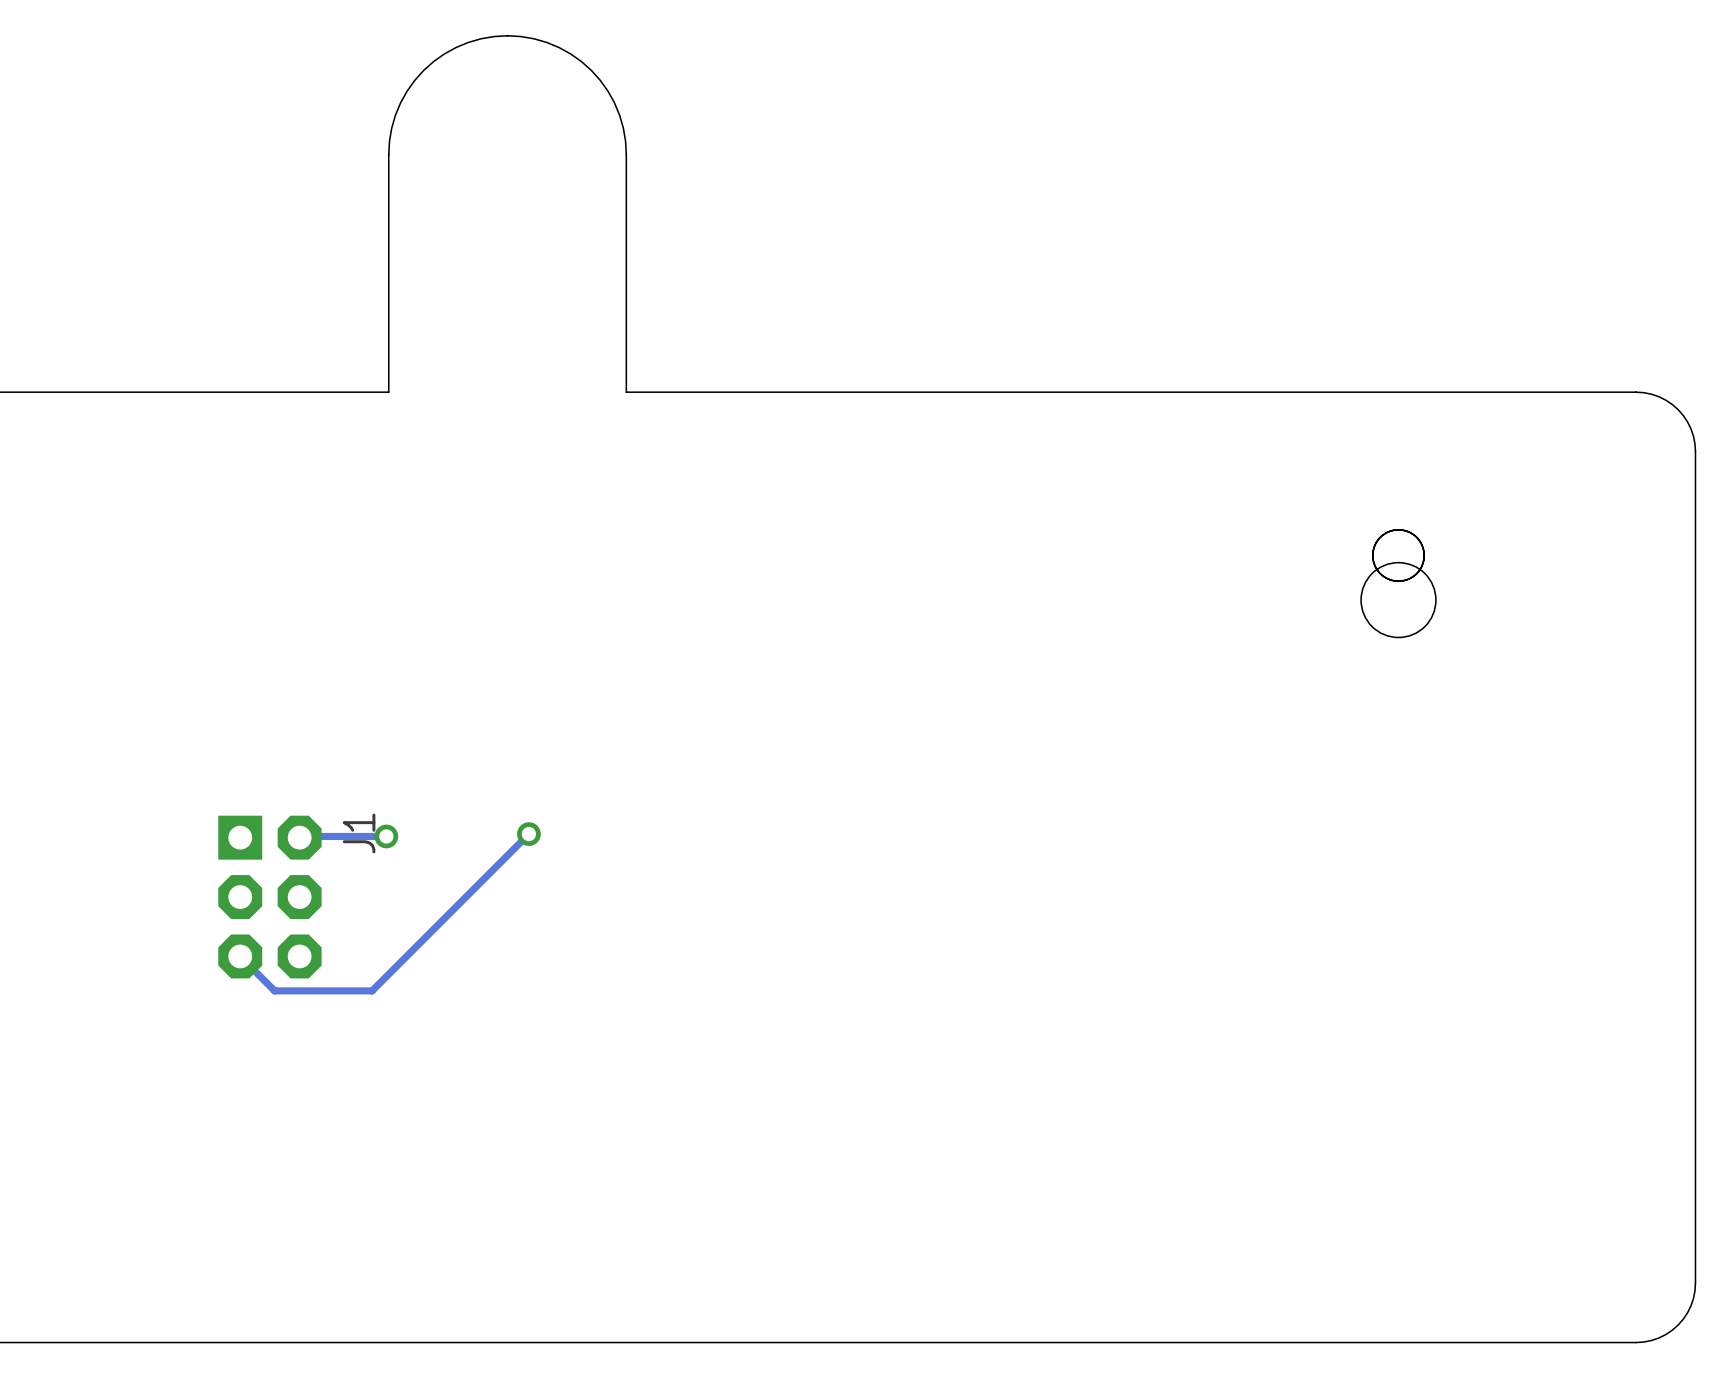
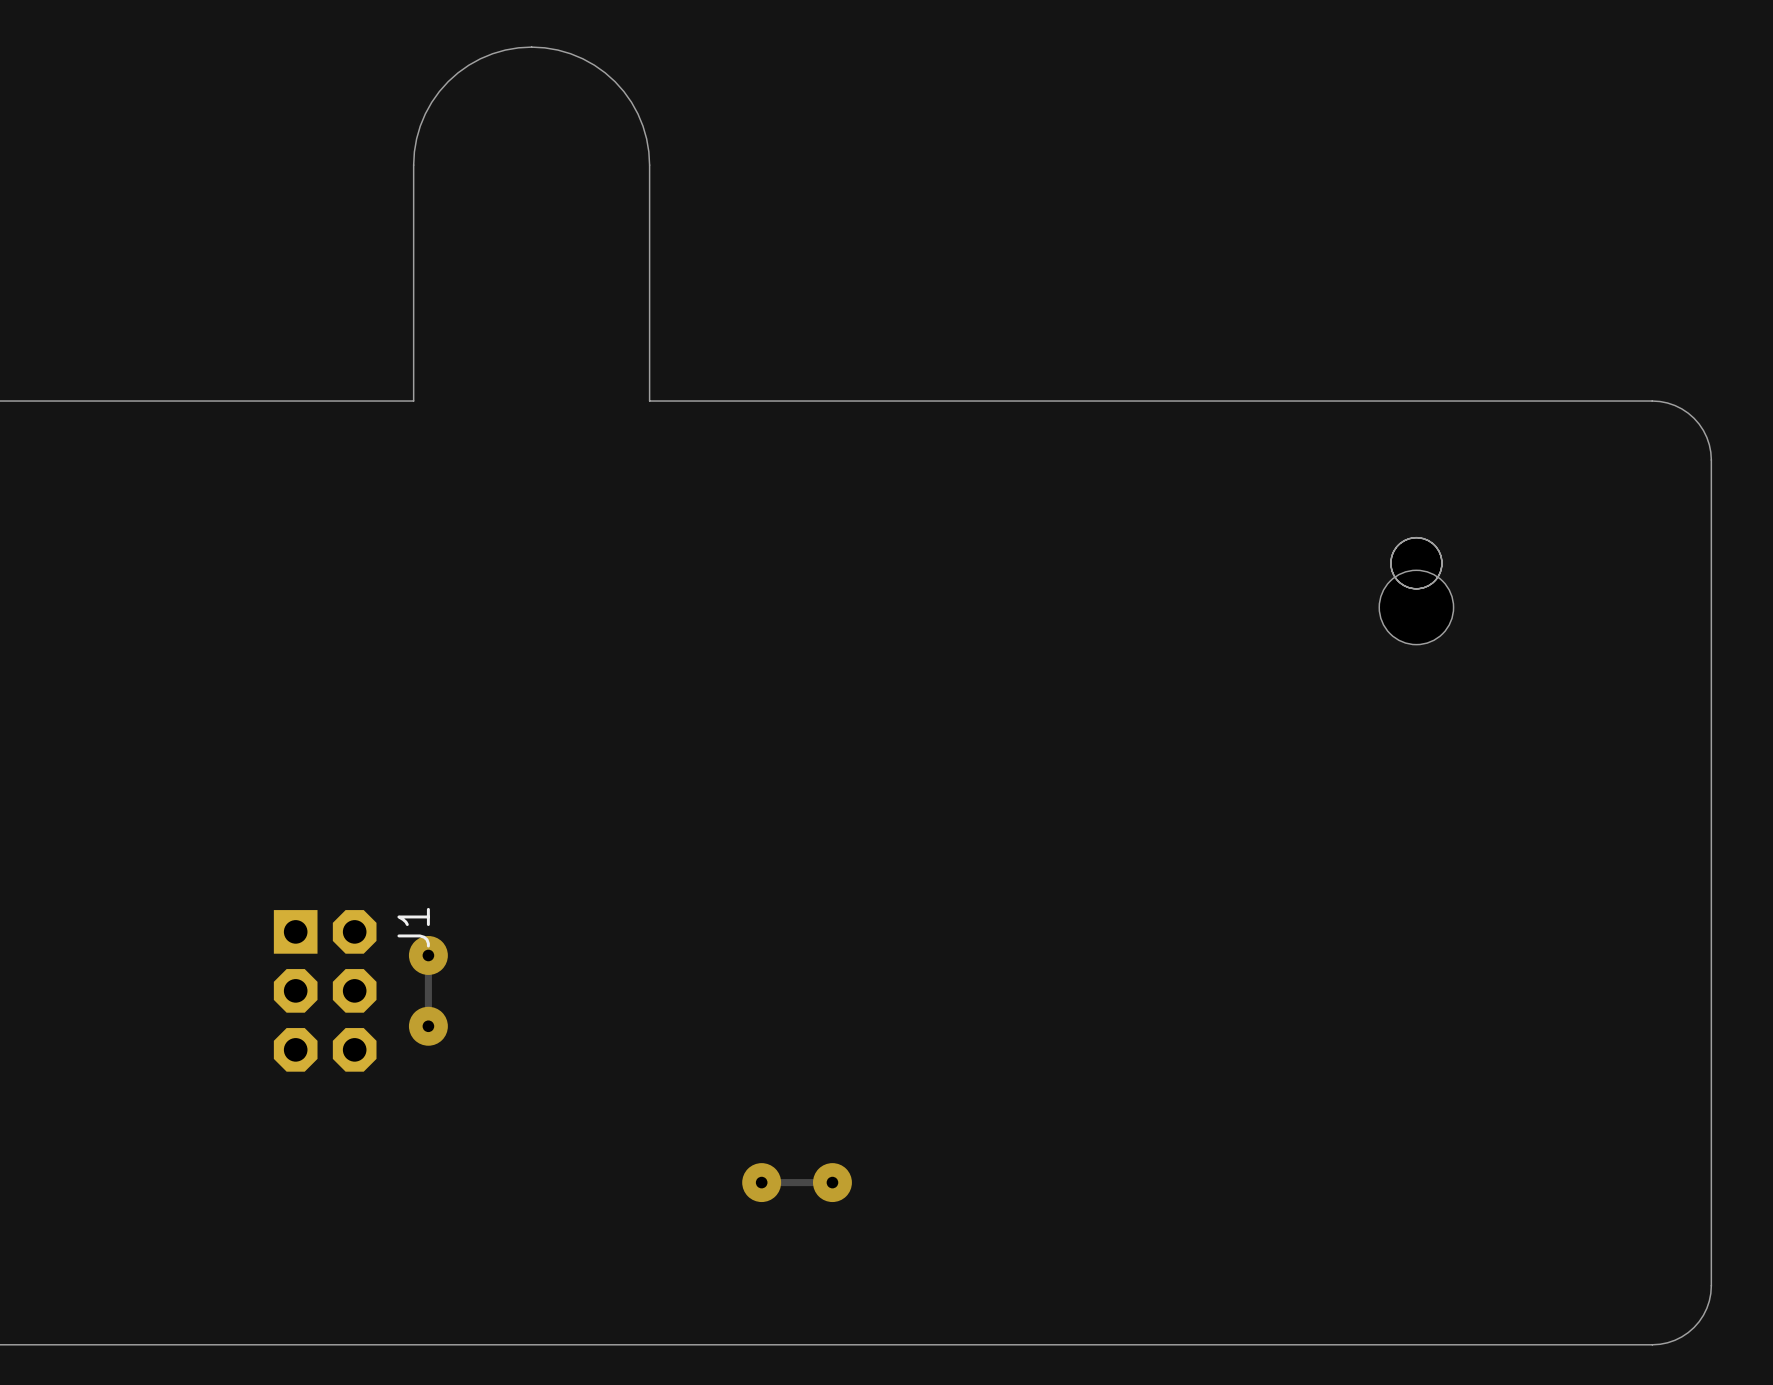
track: (528, 834) (372, 990) (274, 990) (240, 956) -> none
via: (528, 834) -> none
track: (386, 836) (299, 837) -> none
via: (386, 836) -> none
J1 position: (269, 897) -> (325, 990)
track: none -> (428, 955) (428, 1026)
via: none -> (428, 955)
via: none -> (428, 1026)
via: none -> (761, 1182)
track: none -> (832, 1182) (761, 1182)
via: none -> (832, 1182)

